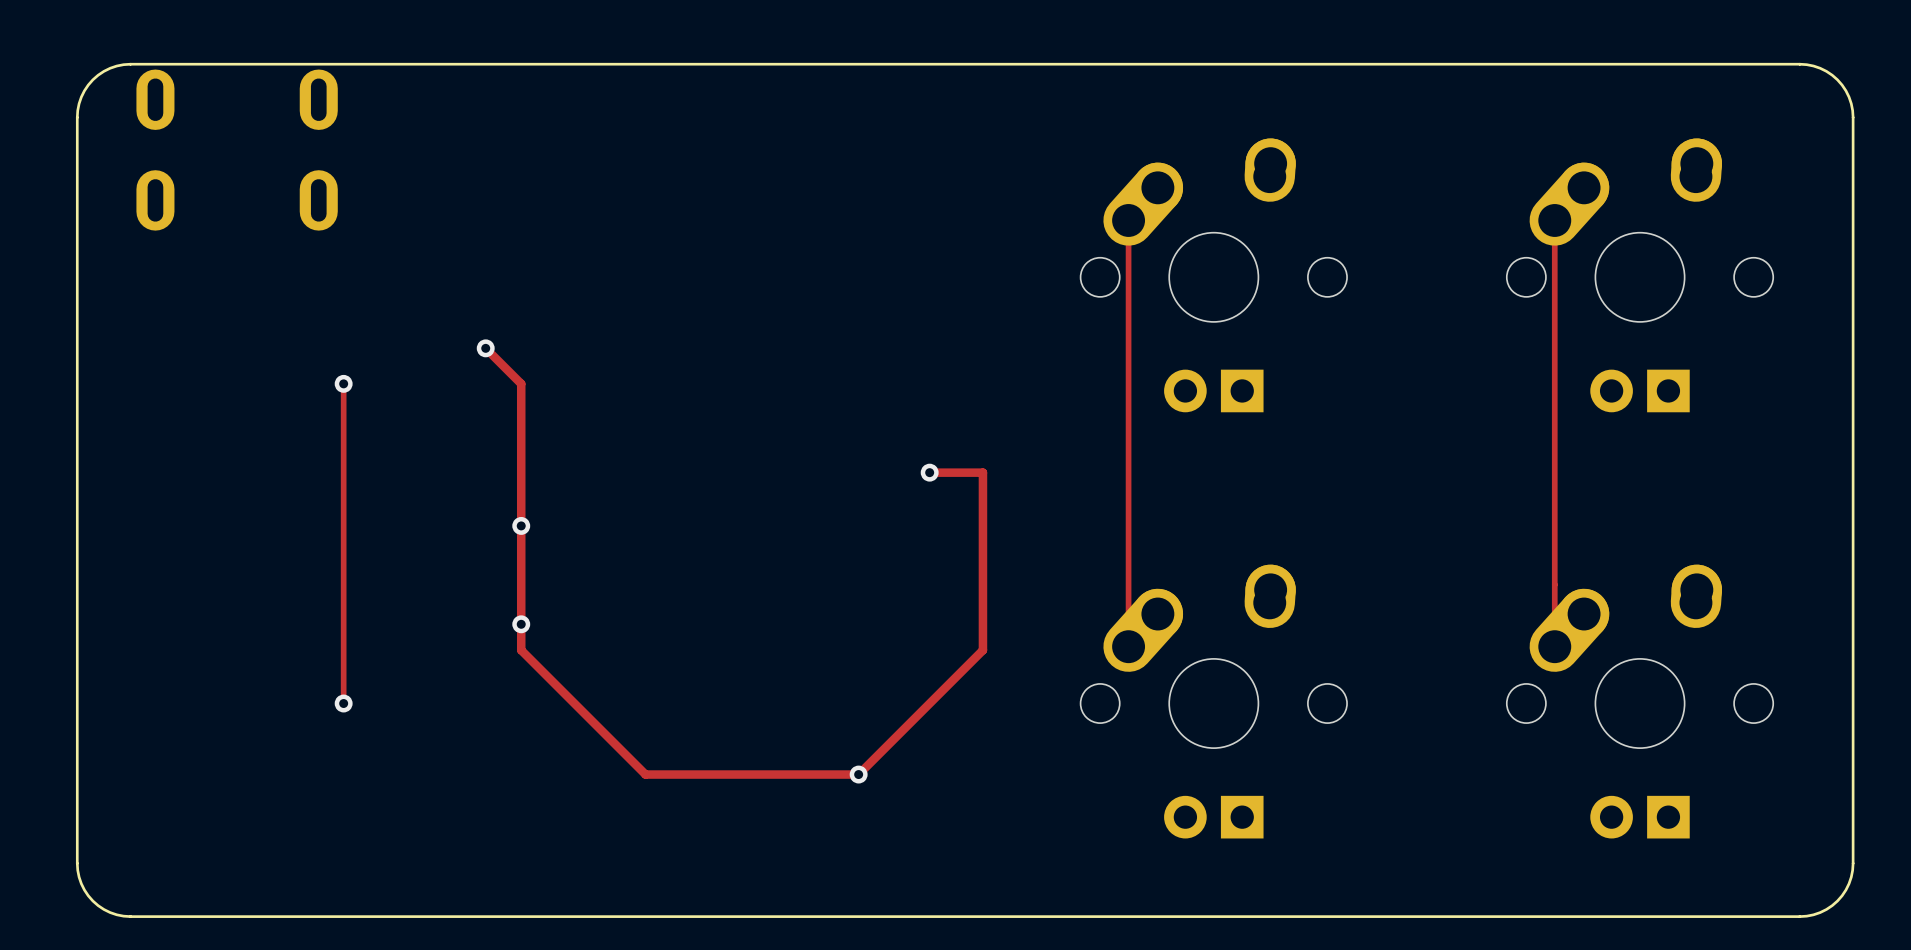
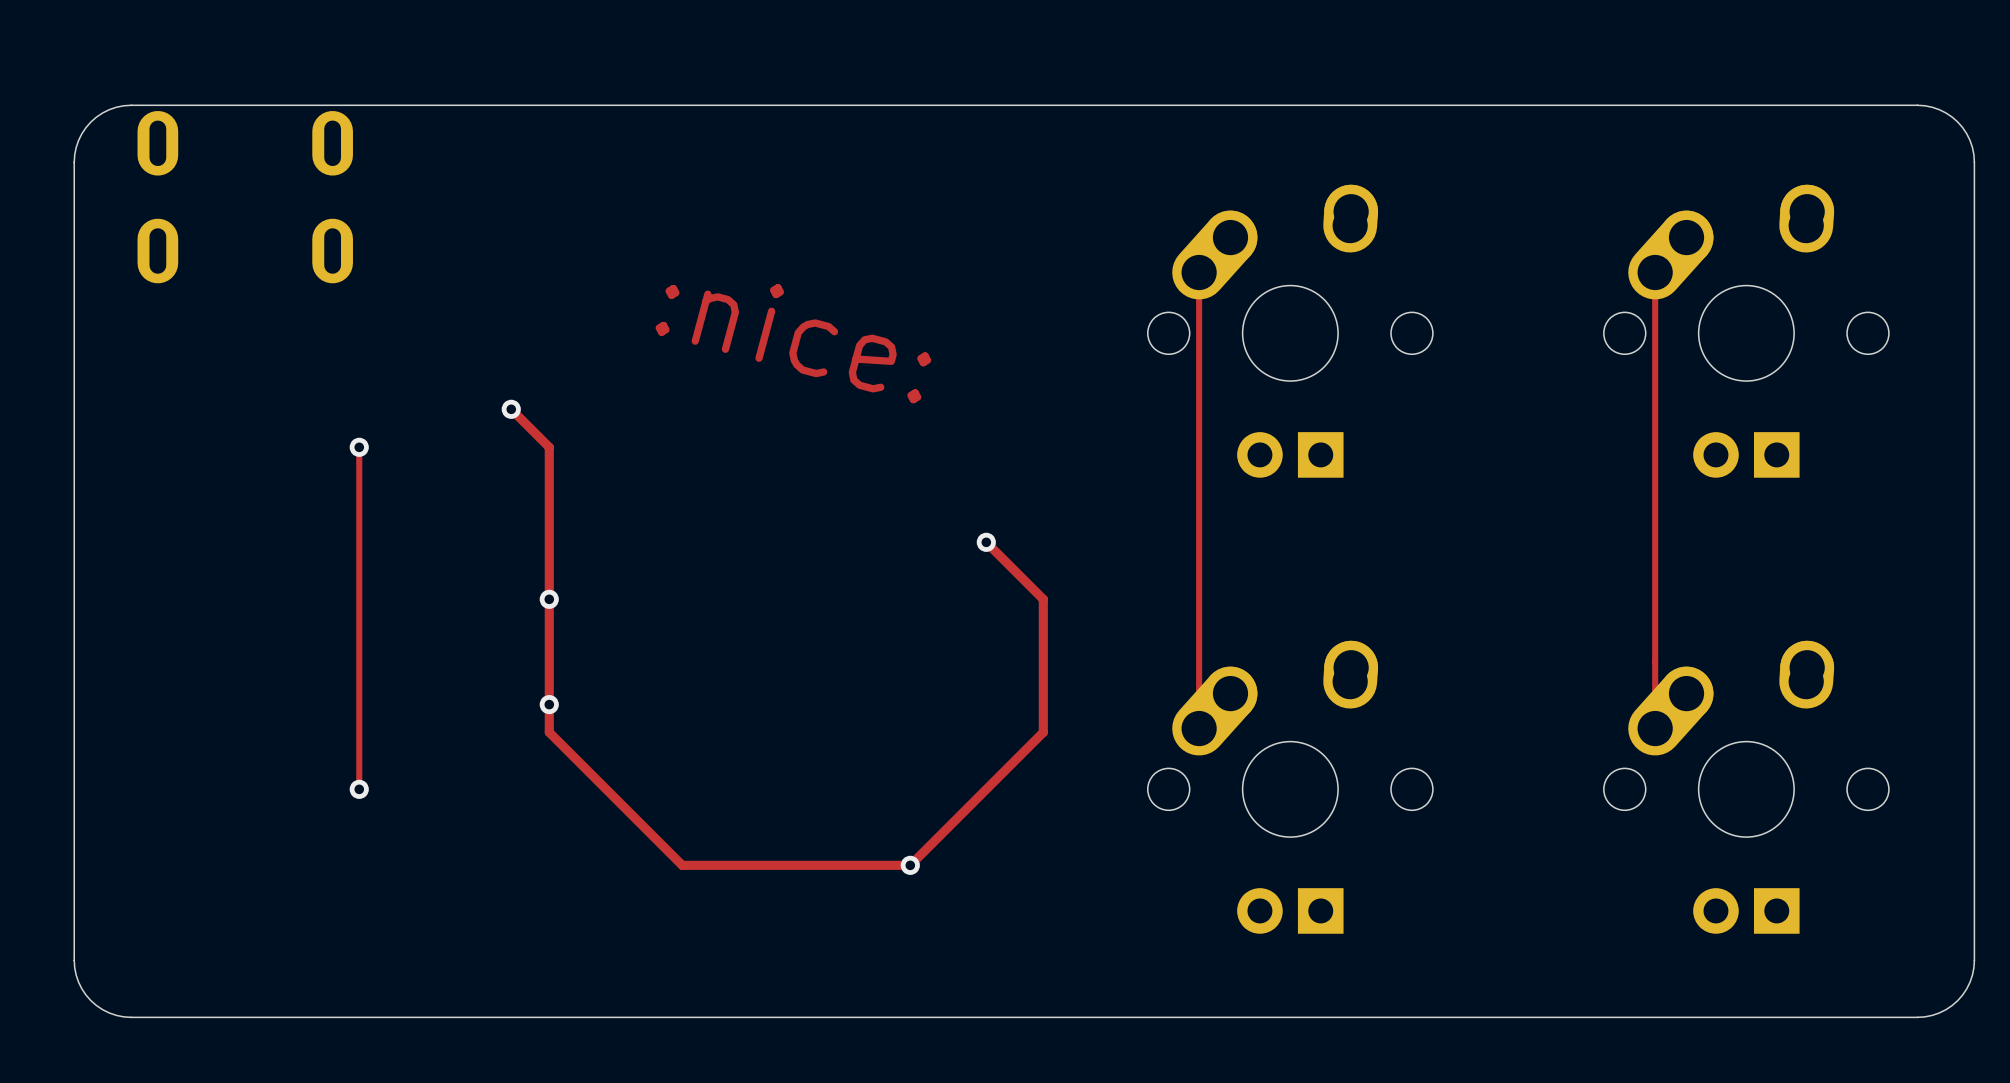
line: (130, 64) (1799, 64) (1820, 68) (1832, 75) (1845, 90) (1851, 103) (1853, 117) (1853, 863) (1849, 883) (1842, 895) (1826, 909) (1813, 914) (1799, 916) (130, 916) (110, 912) (98, 905) (88, 895) (79, 877) (77, 863) (77, 117) (81, 97) (92, 79) (110, 68) (130, 64) -> none
board edge: none -> (131, 105) (1917, 105) (1939, 109) (1952, 117) (1966, 133) (1972, 147) (1974, 162) (1974, 960) (1970, 982) (1962, 995) (1945, 1009) (1932, 1015) (1917, 1017) (131, 1017) (109, 1013) (96, 1005) (86, 995) (76, 975) (74, 960) (74, 162) (78, 140) (90, 121) (109, 109) (131, 105)
text: none -> :nice: (793, 343)
track: (929, 472) (982, 472) (982, 525) -> (986, 542) (1043, 599)

